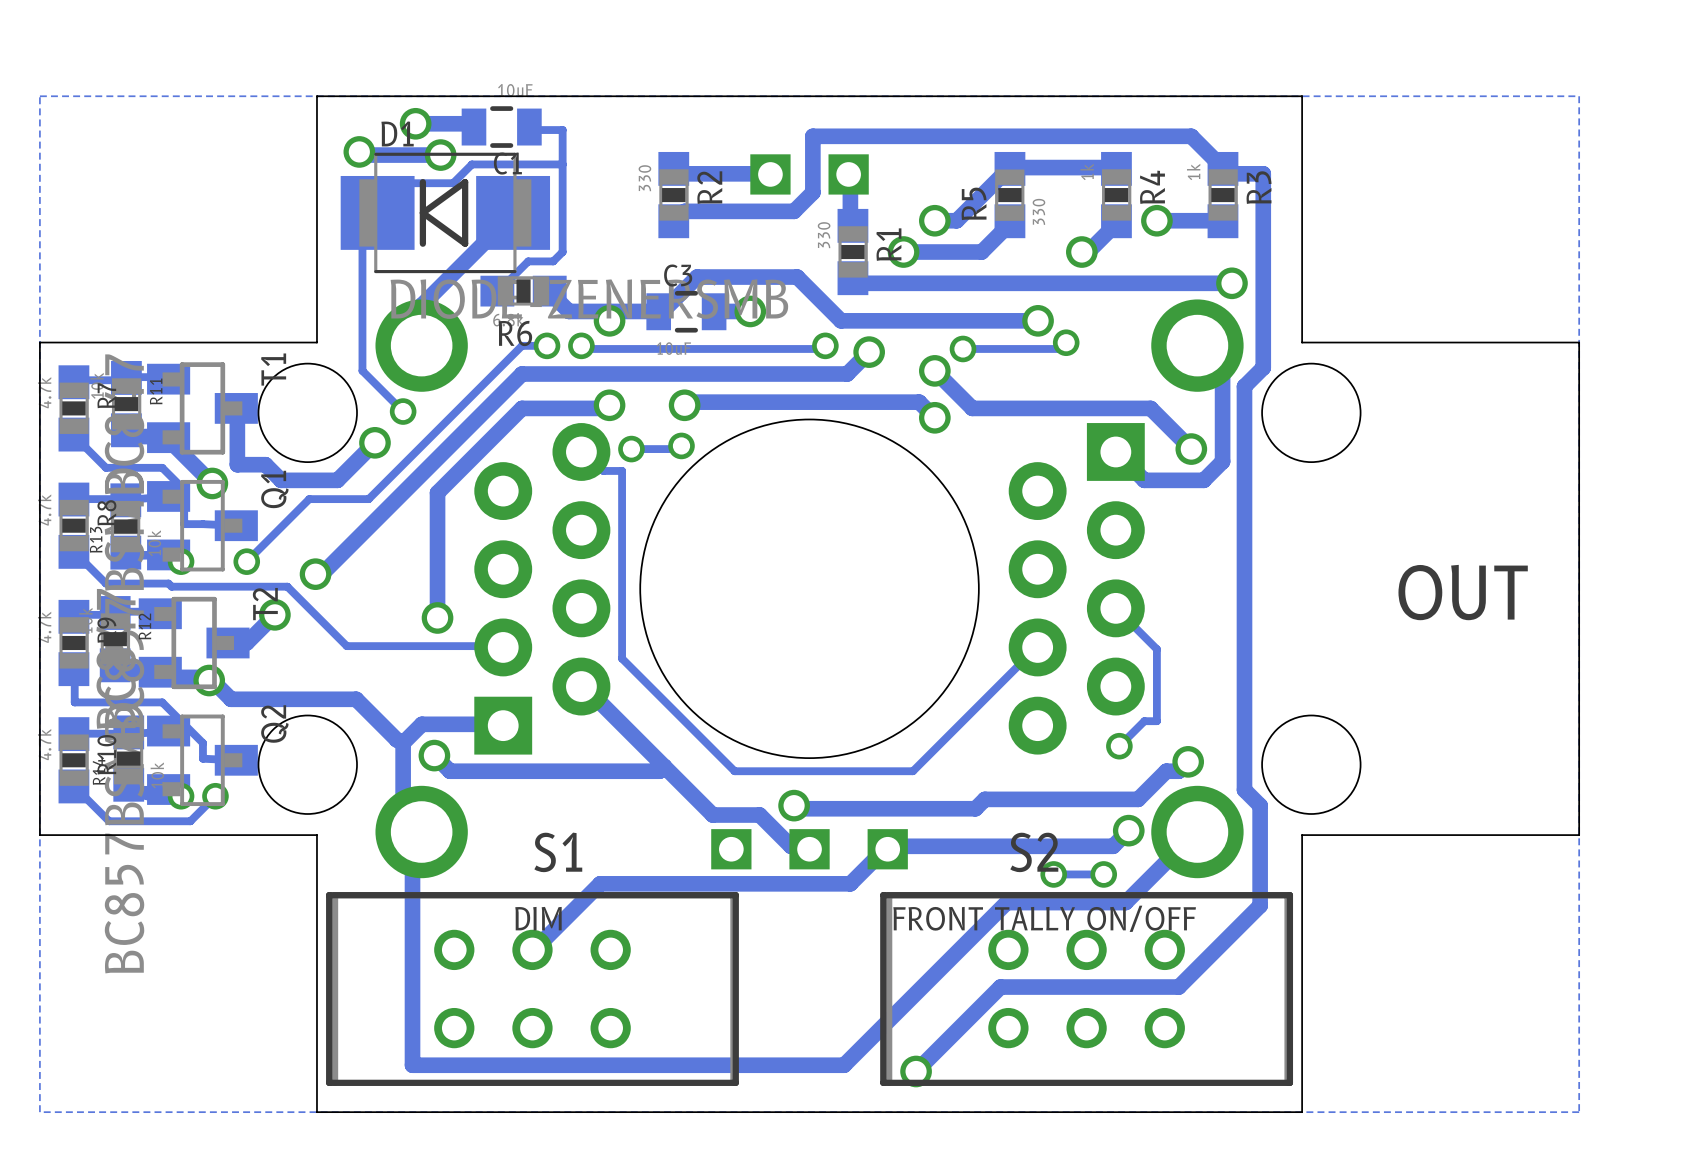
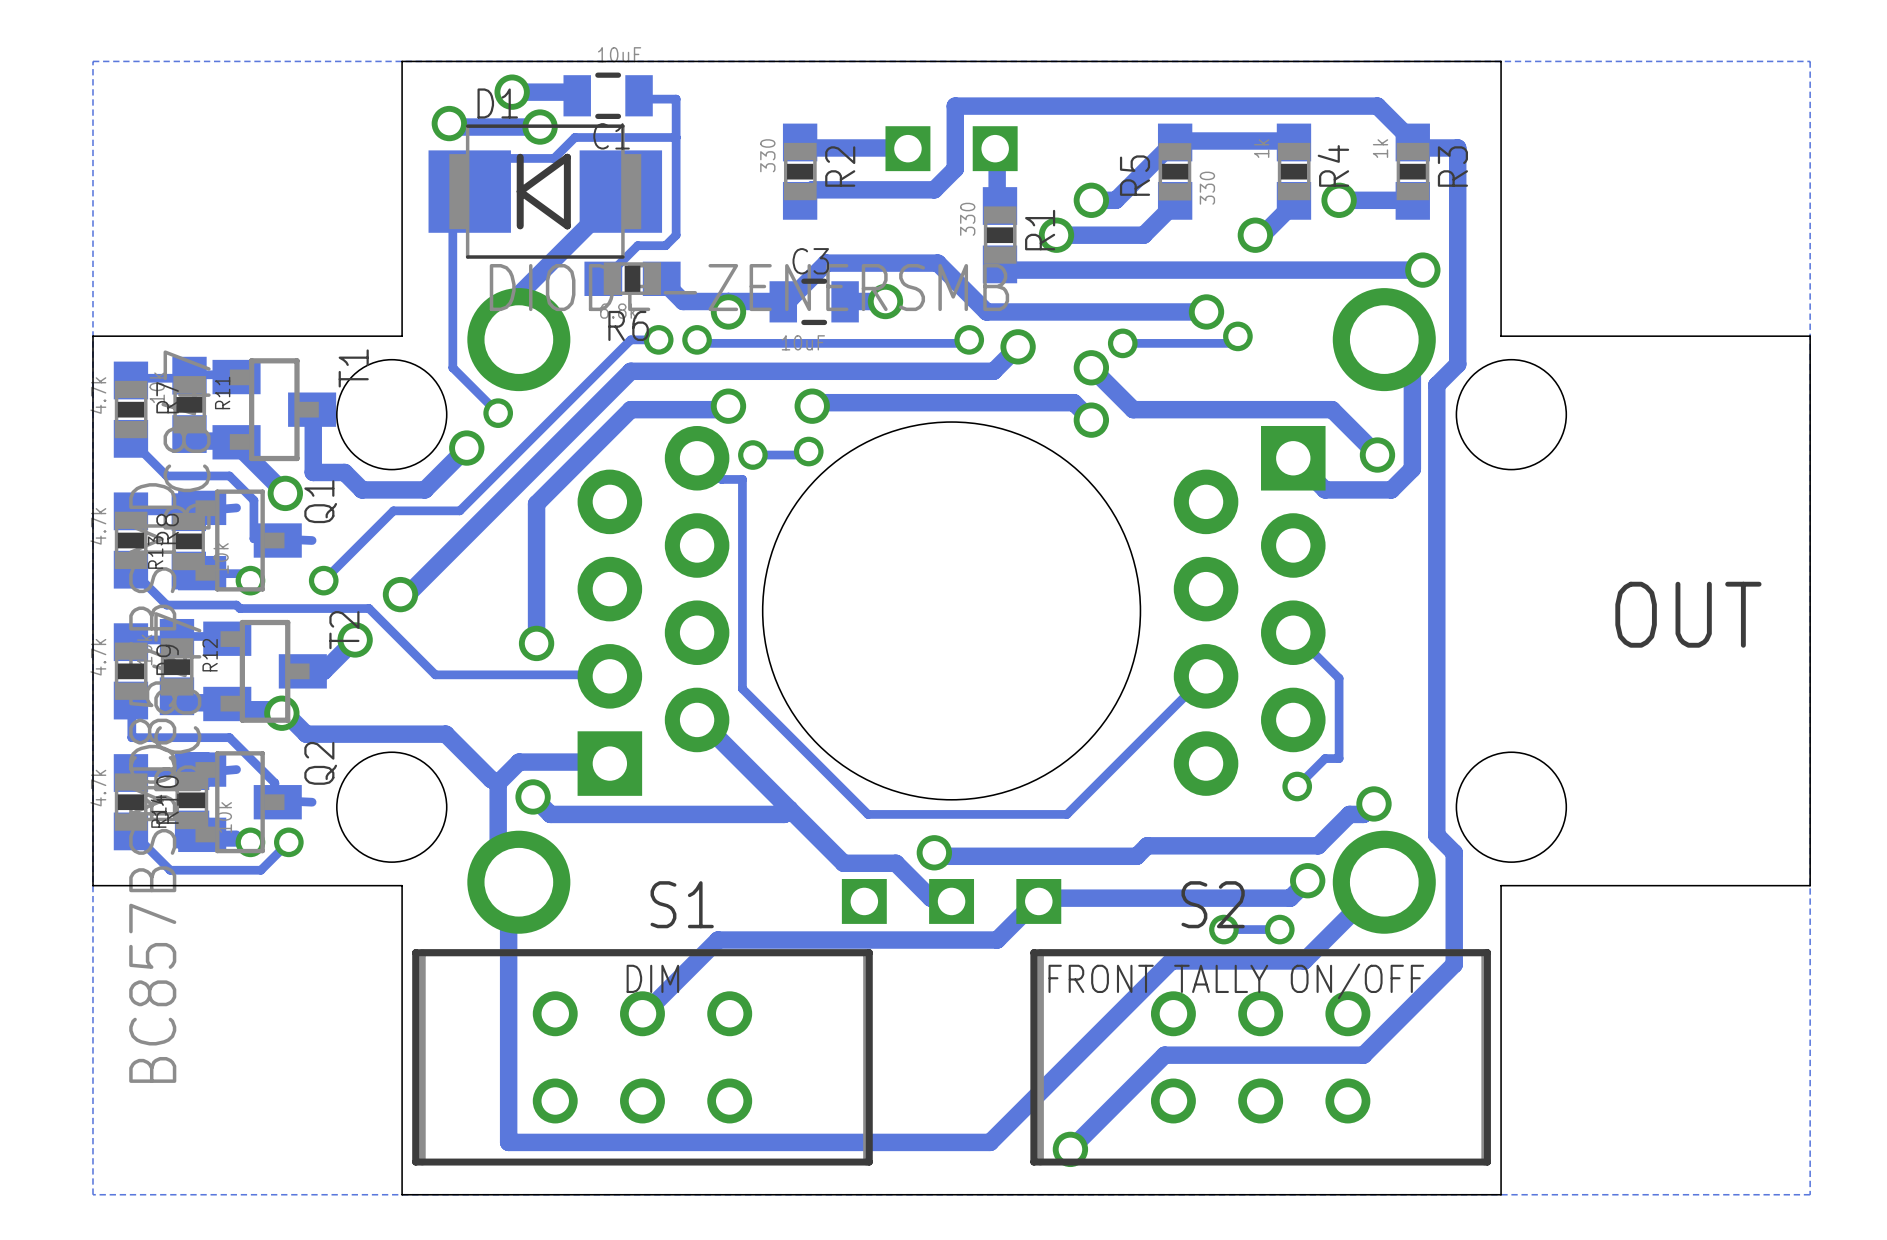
Q1 position: (202, 525) -> (239, 540)
Q2 position: (202, 760) -> (239, 802)

